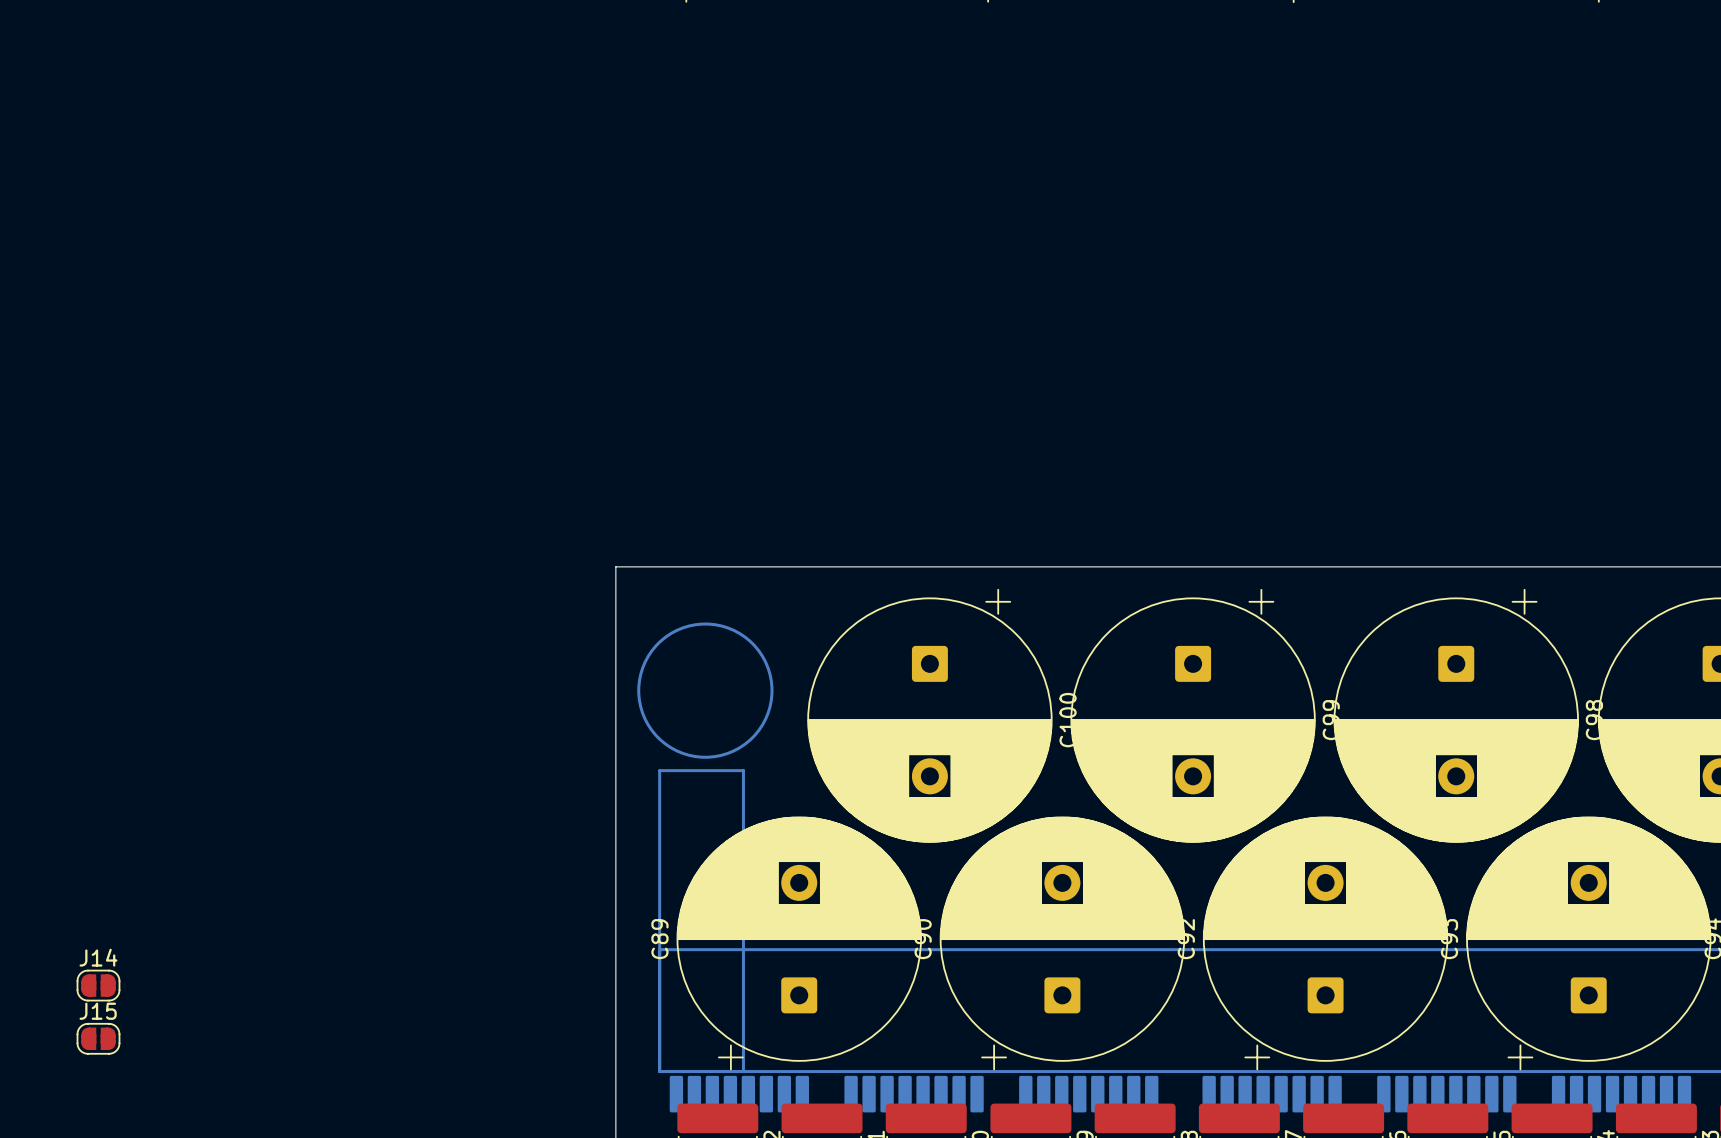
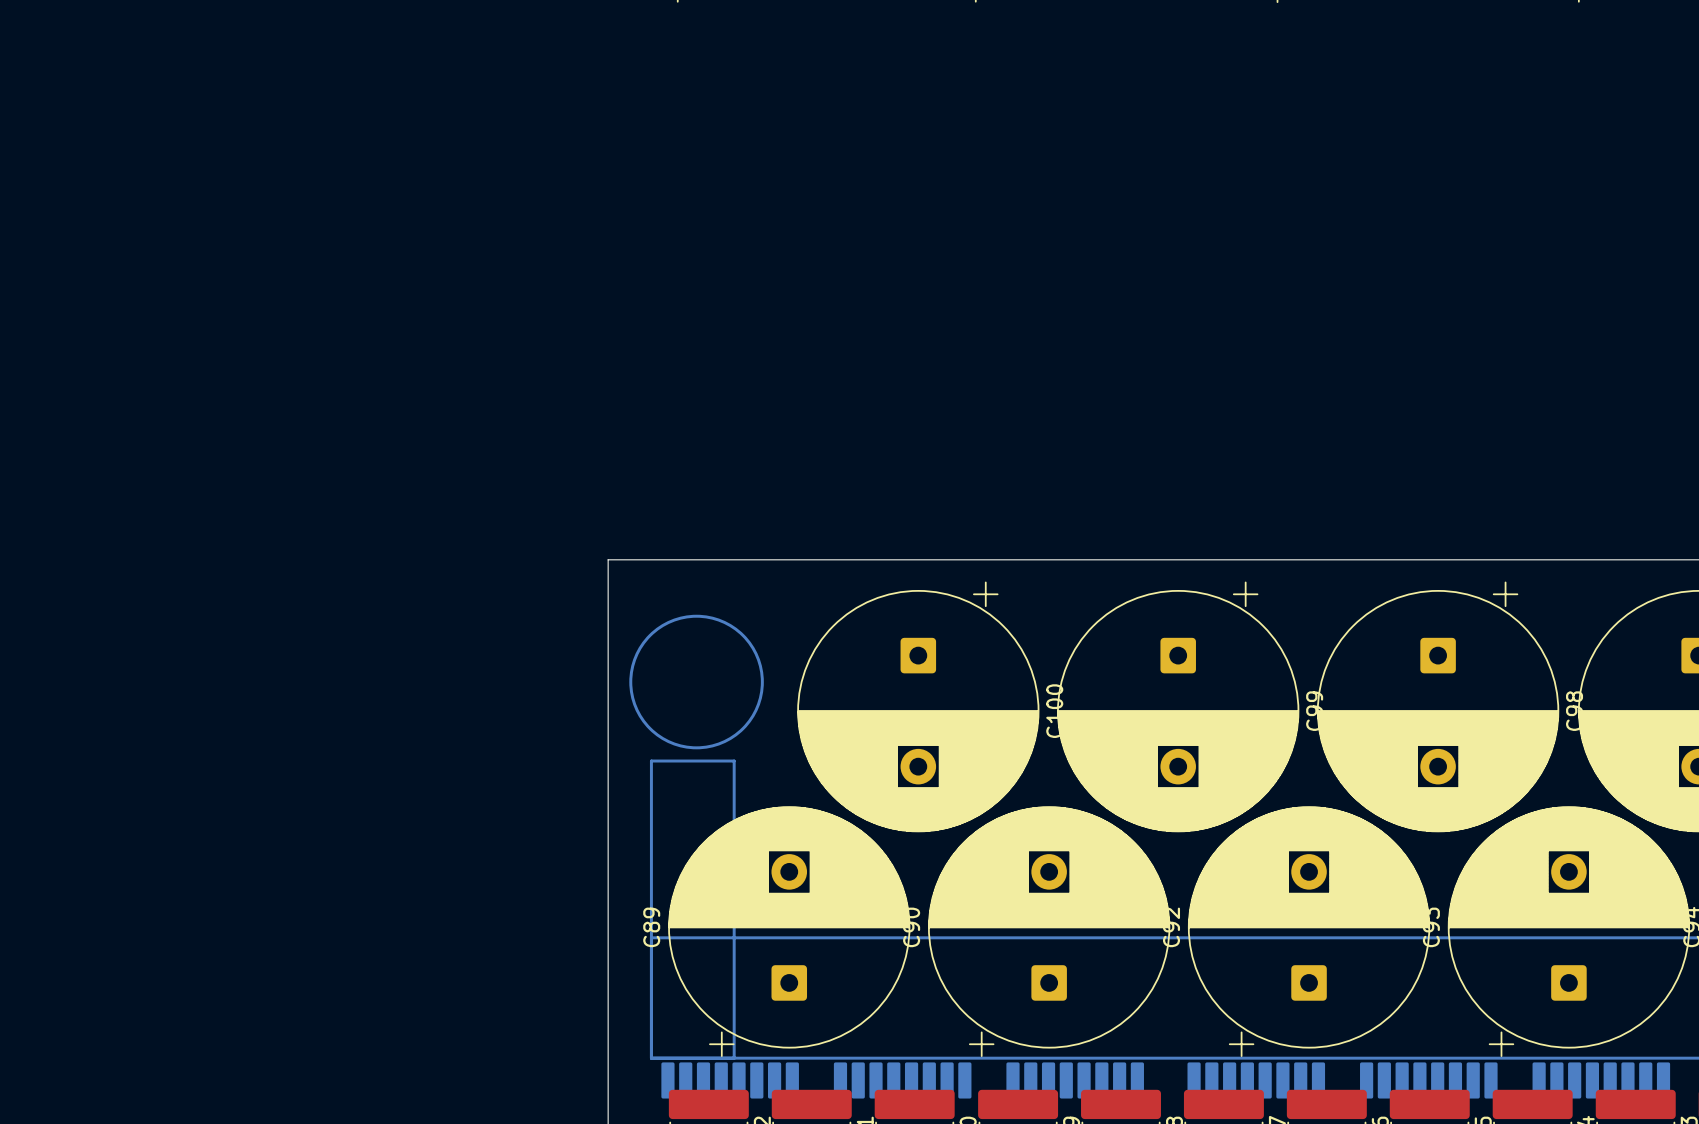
J14: (98, 985) -> none
J15: (98, 1038) -> none

